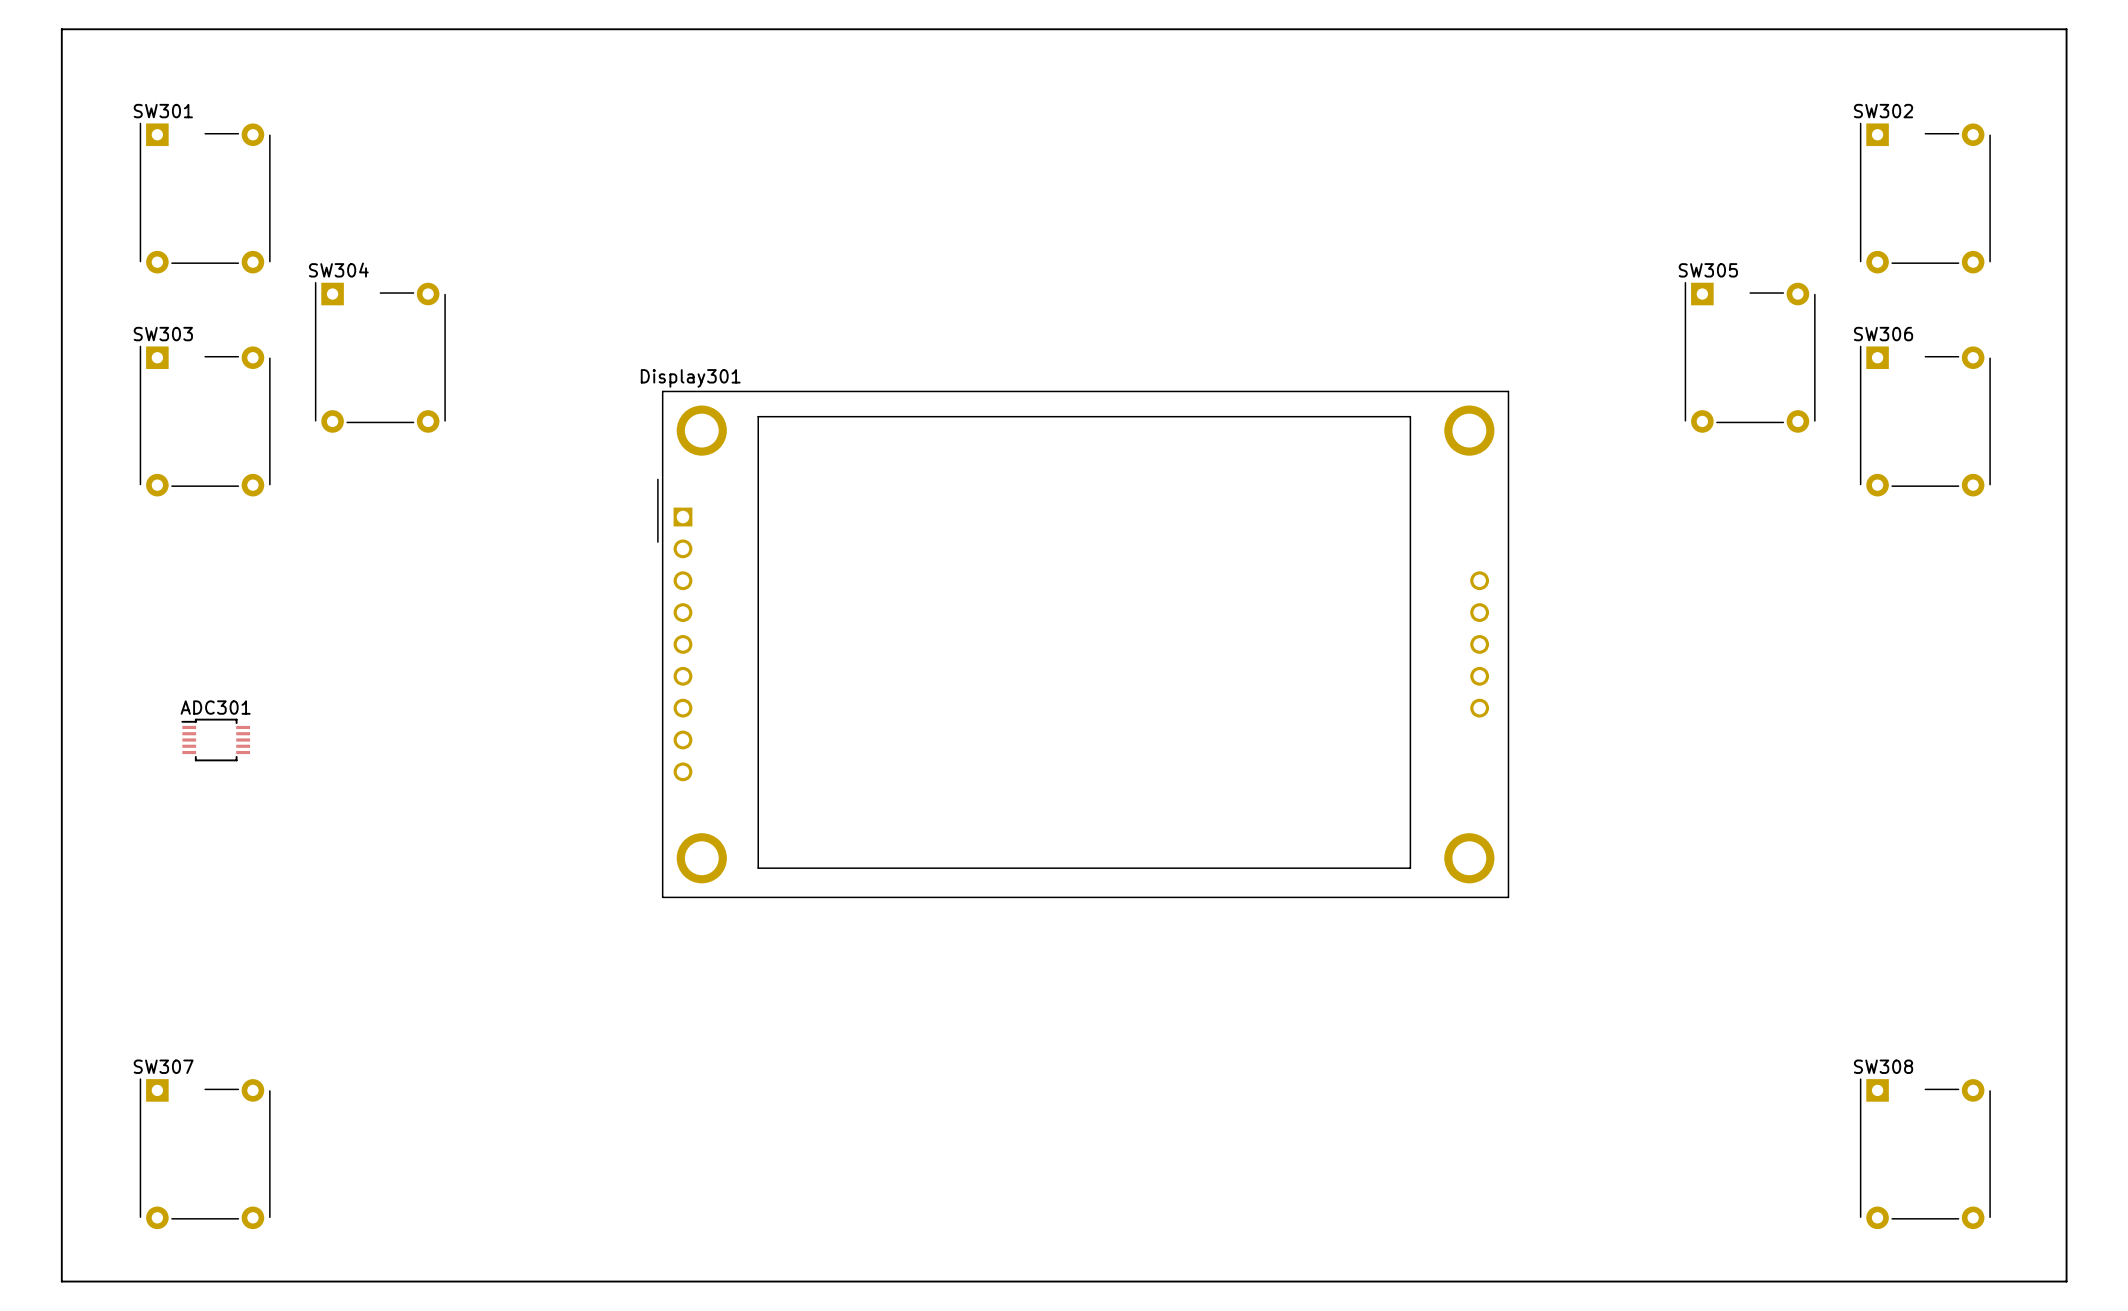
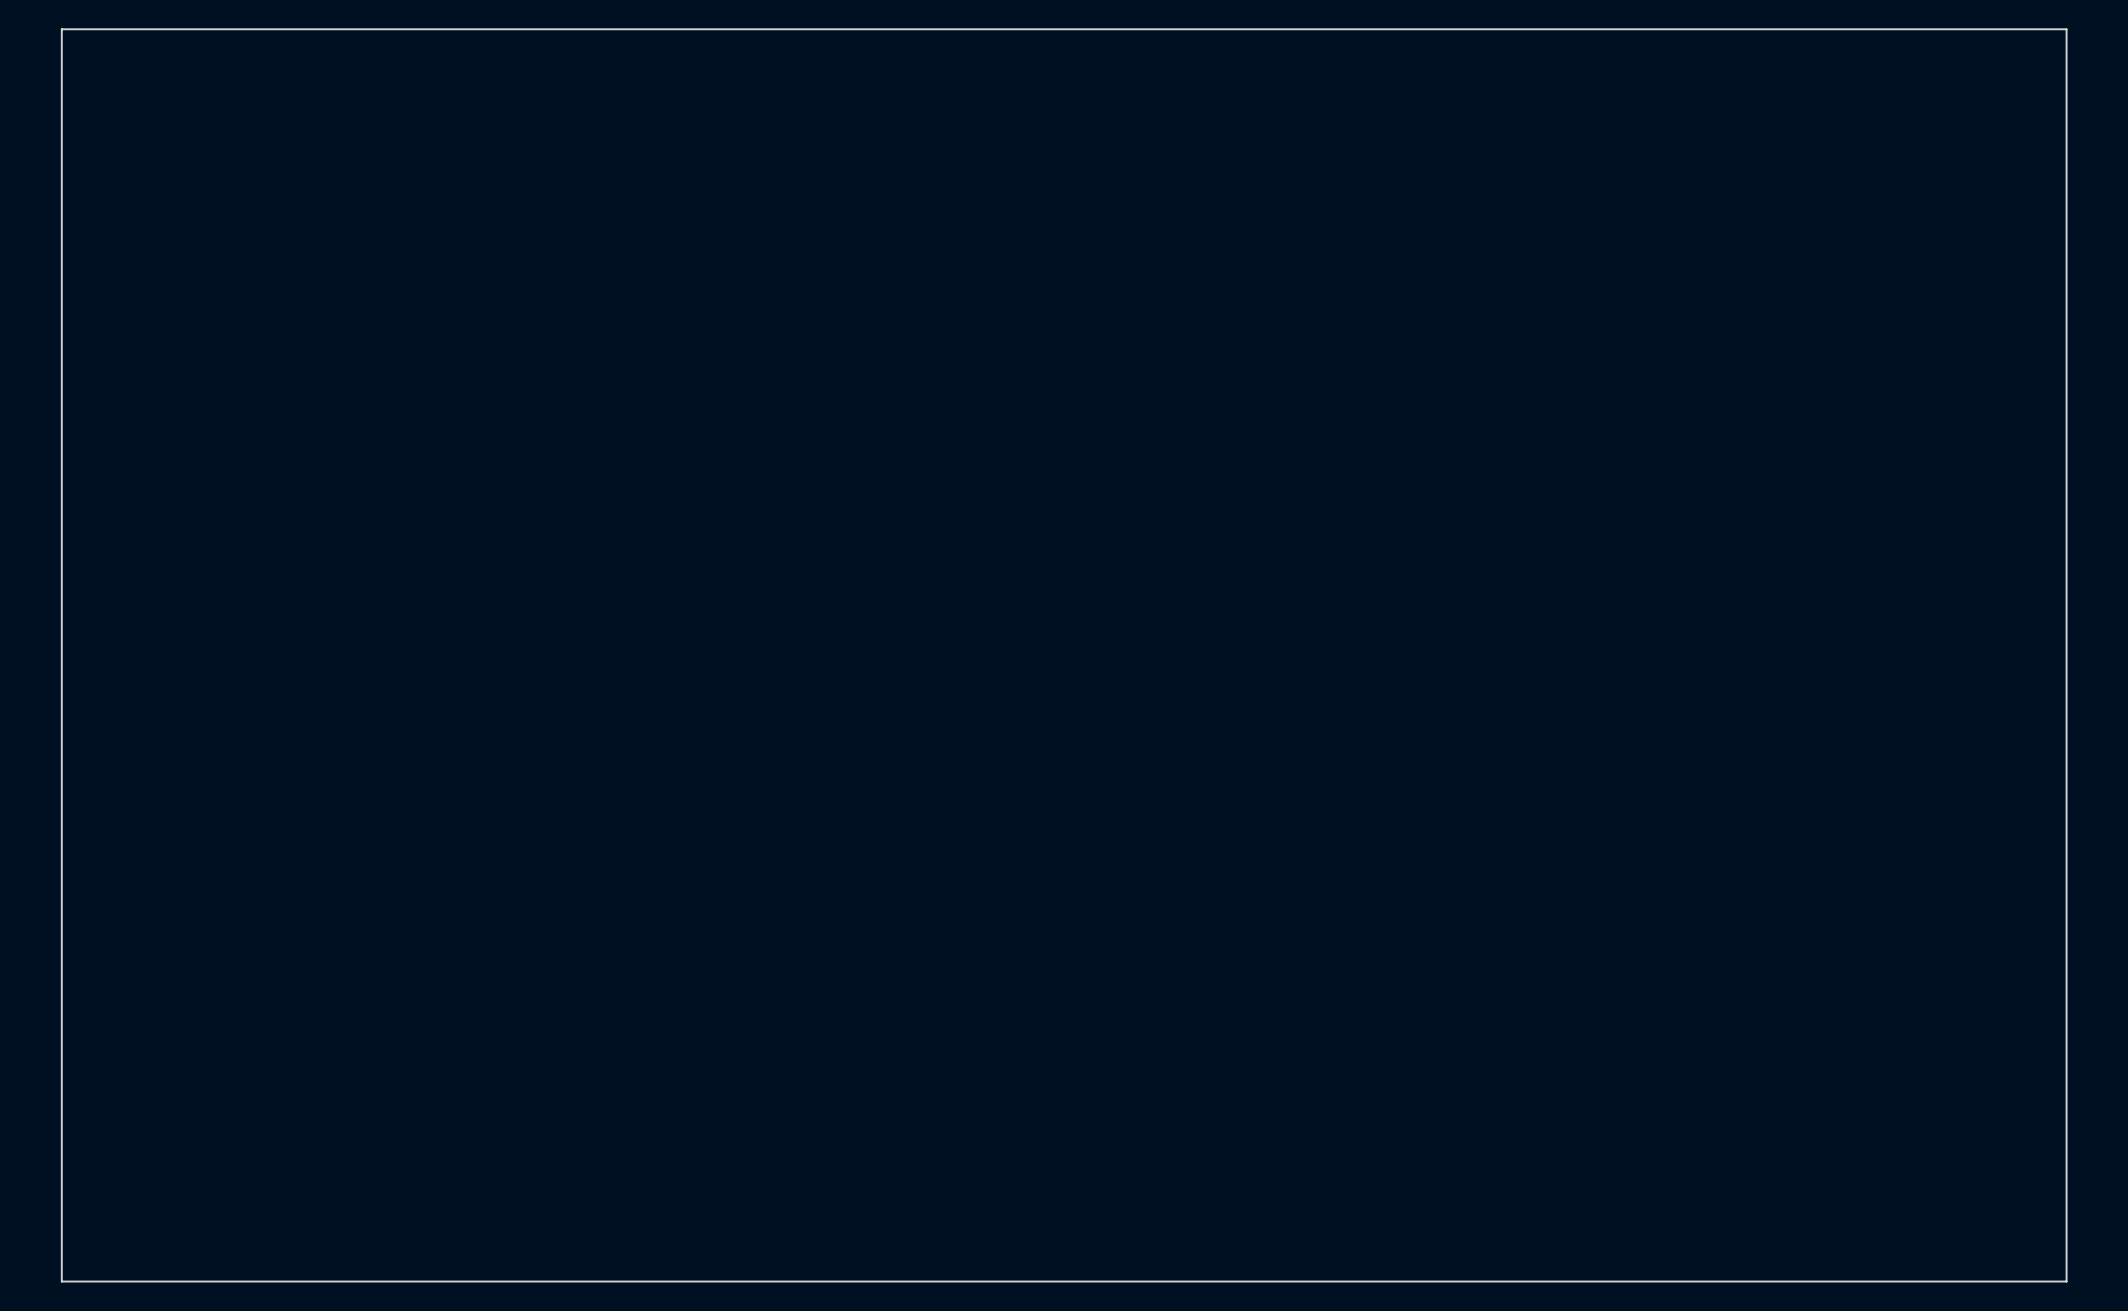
SW301: (205, 198) -> none
SW302: (1925, 198) -> none
SW304: (380, 357) -> none
SW305: (1750, 357) -> none
SW303: (205, 421) -> none
SW306: (1925, 421) -> none
Display301: (1083, 644) -> none
ADC301: (215, 740) -> none
SW307: (205, 1153) -> none
SW308: (1925, 1153) -> none

